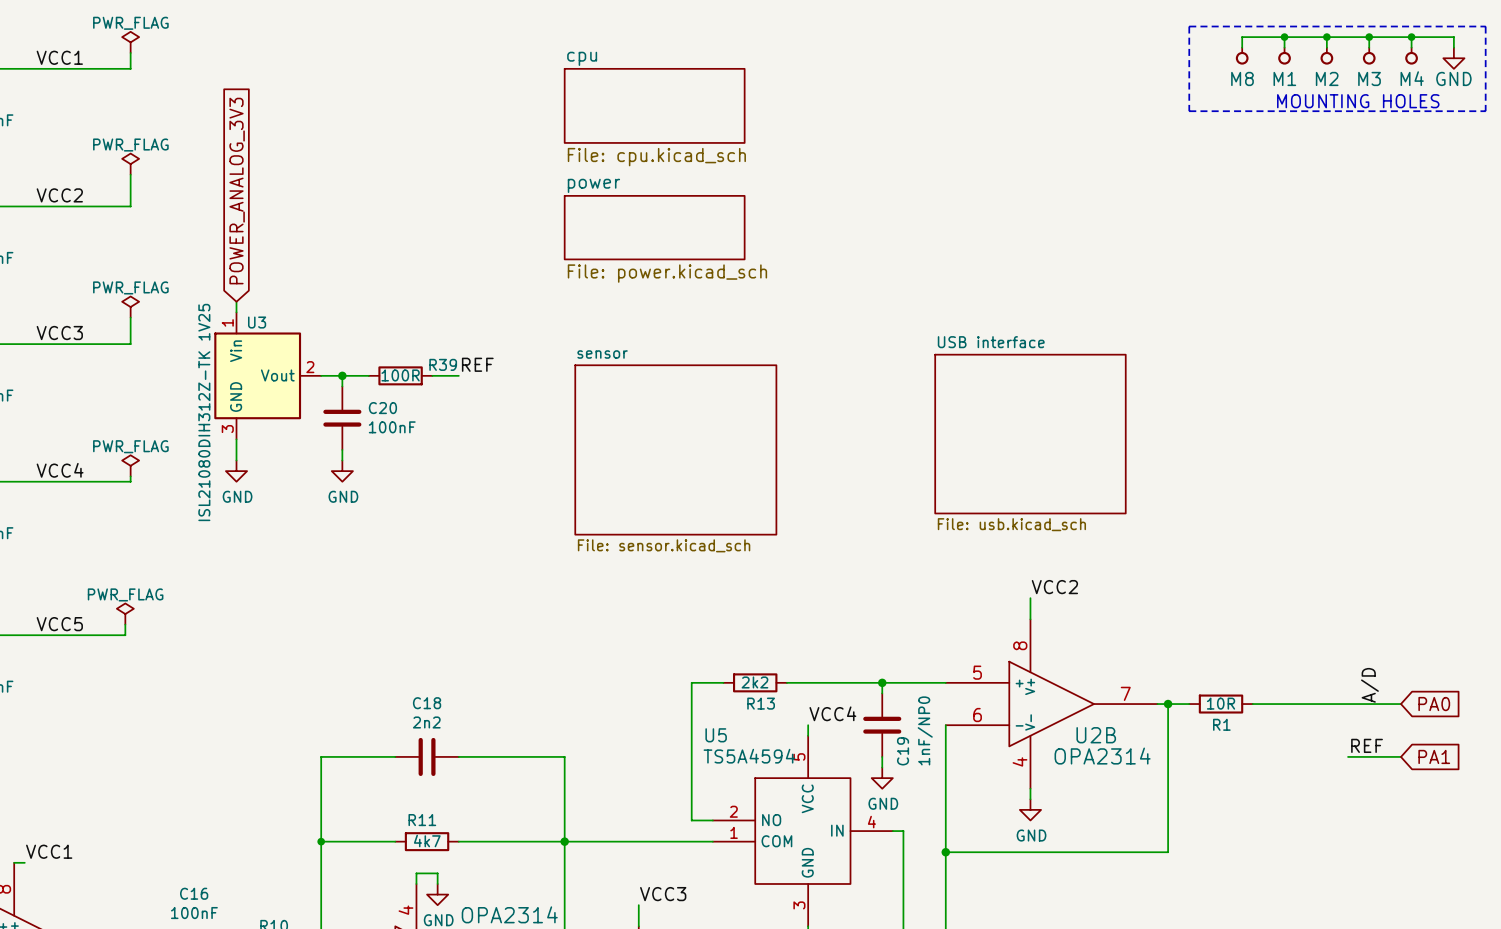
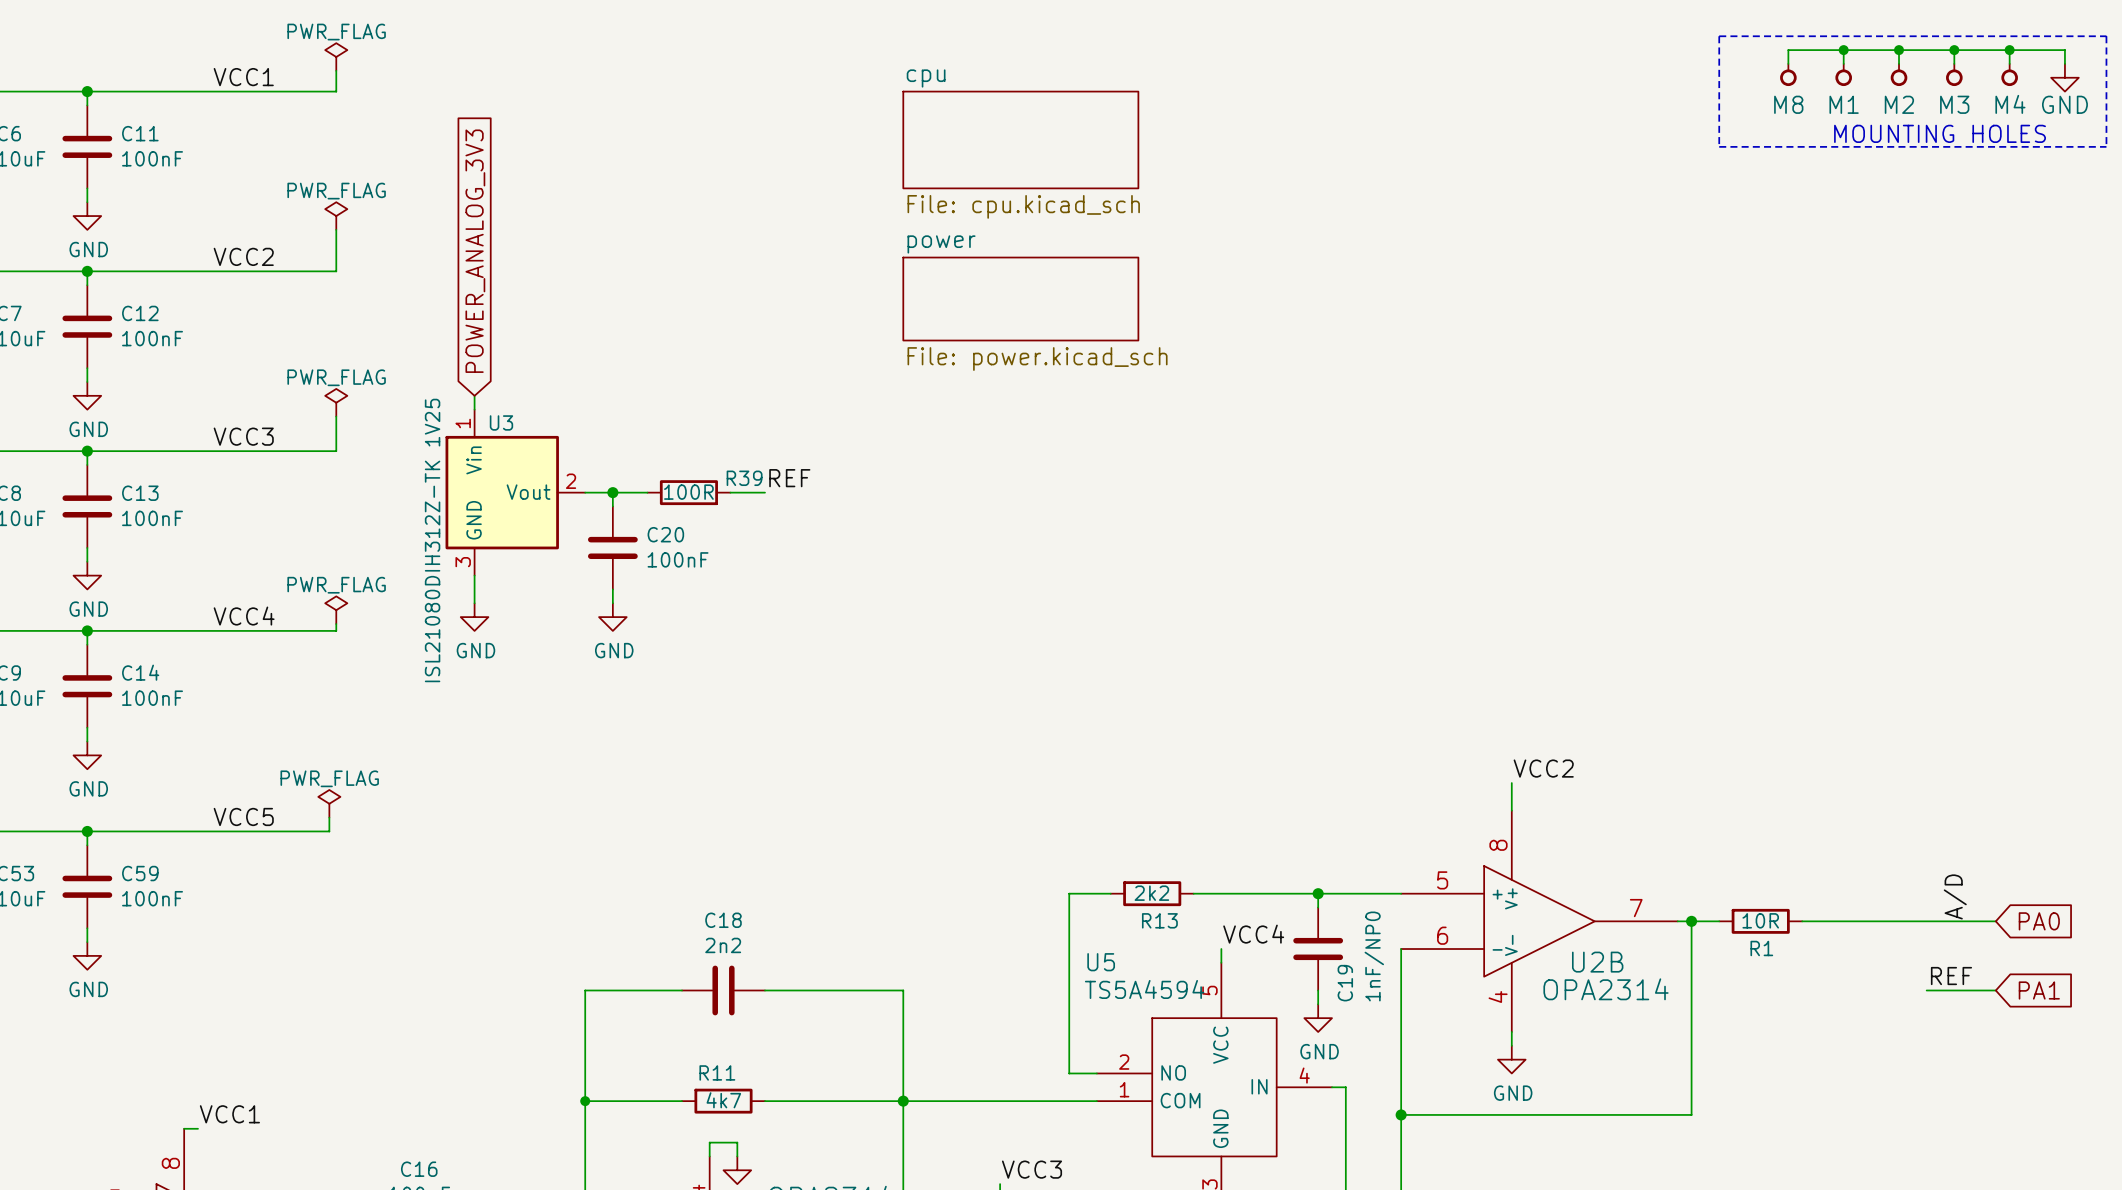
sheet USB interface: File: usb.kicad_sch (1030, 434) -> none
sheet sensor: File: sensor.kicad_sch (675, 449) -> none

